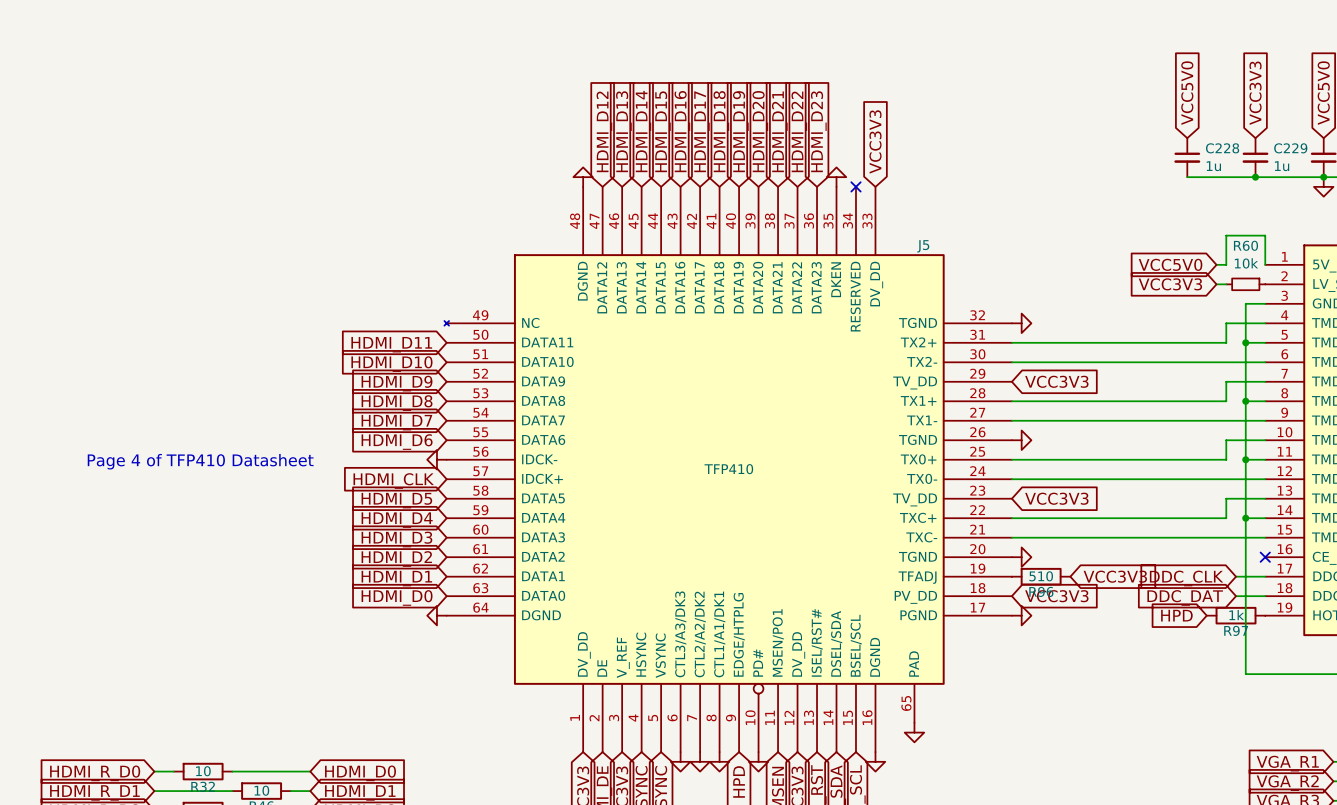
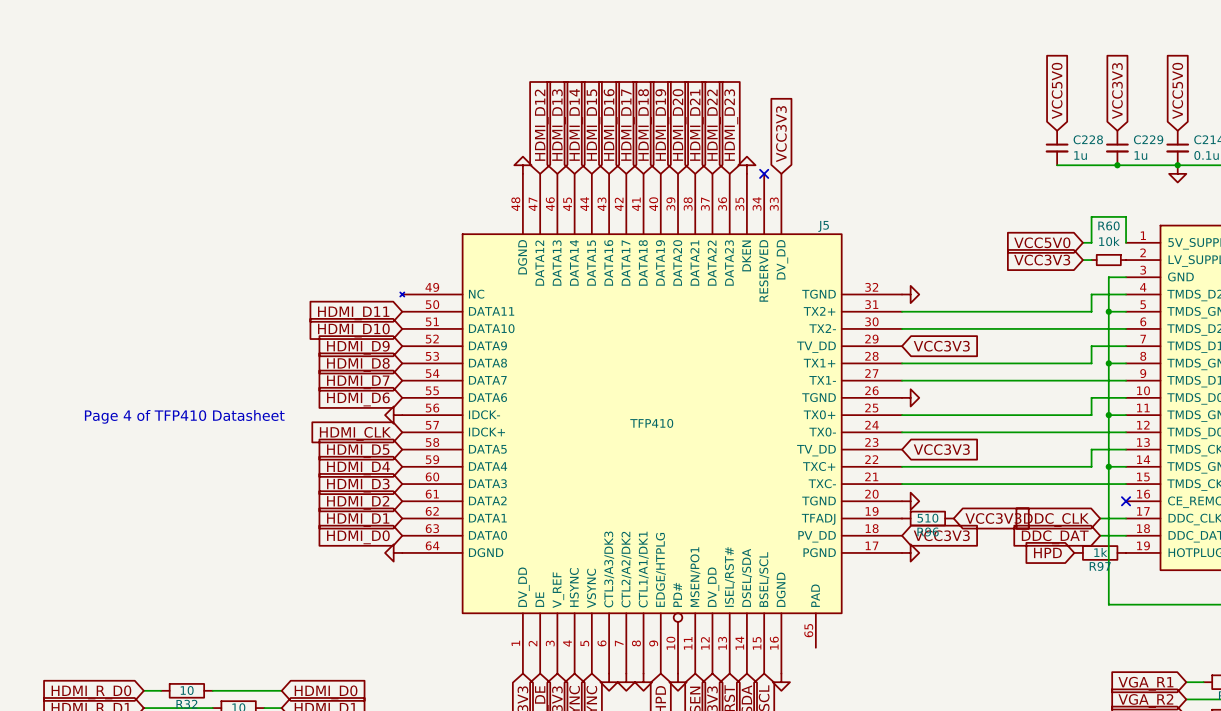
power symbol: (914, 732) -> none

